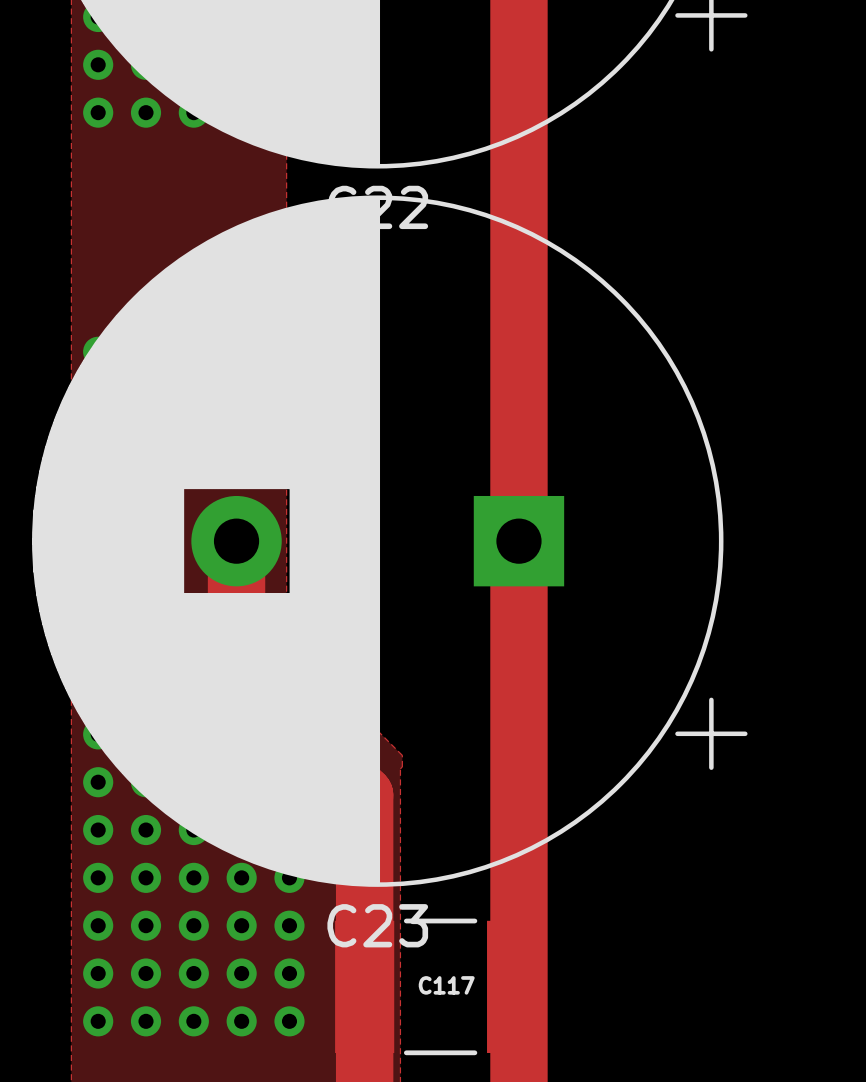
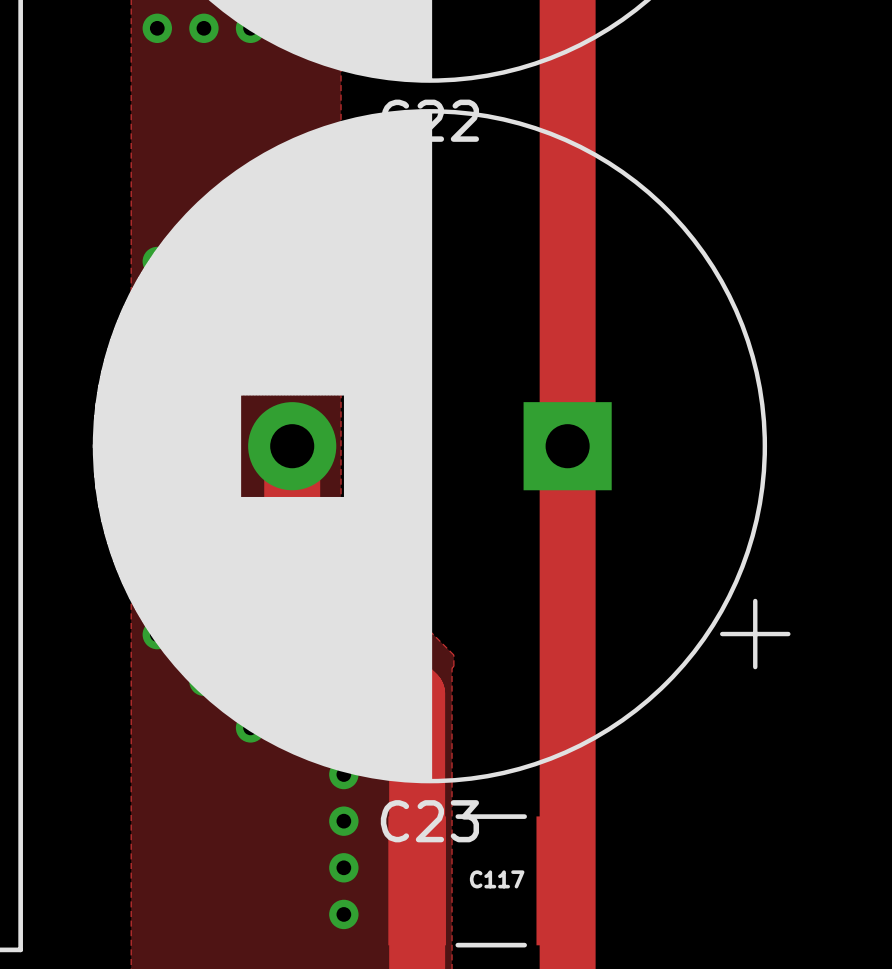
via: (98, 782) -> none
via: (98, 830) -> none
via: (146, 830) -> none
via: (98, 877) -> none
via: (146, 877) -> none
via: (193, 877) -> none
via: (241, 877) -> none
via: (98, 925) -> none
via: (146, 925) -> none
via: (193, 925) -> none
via: (241, 925) -> none
via: (98, 973) -> none
via: (146, 973) -> none
via: (193, 973) -> none
via: (241, 973) -> none
via: (98, 1021) -> none
via: (146, 1021) -> none
via: (193, 1021) -> none
via: (241, 1021) -> none

